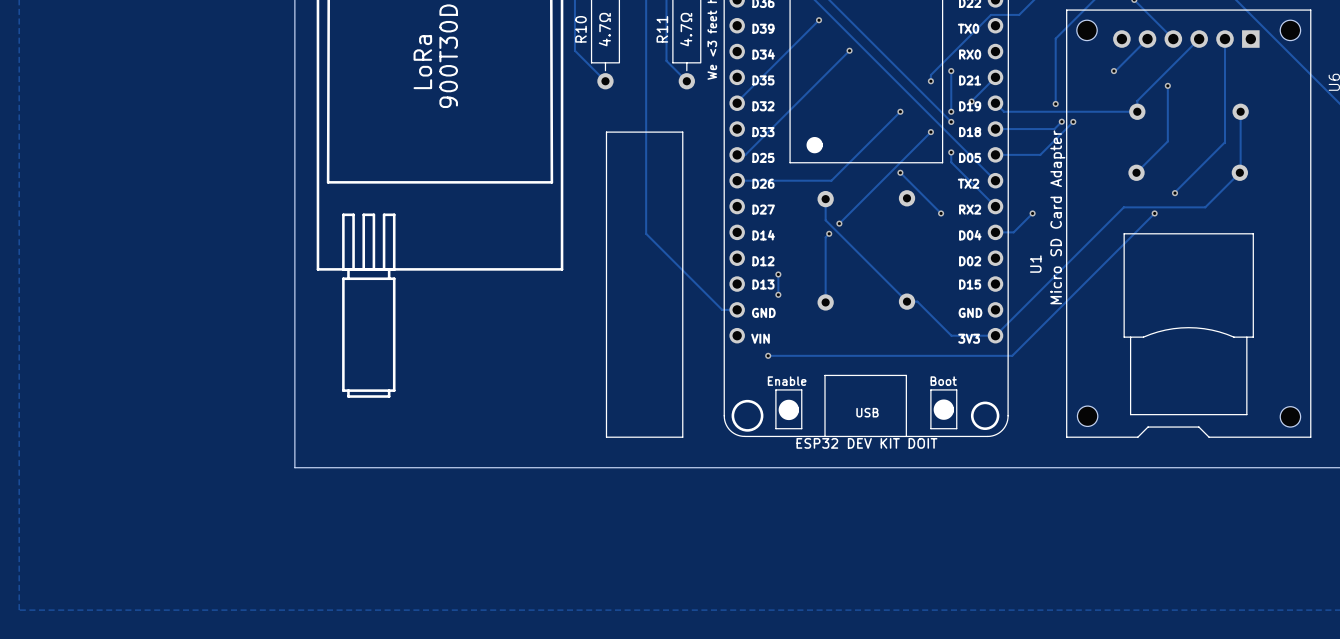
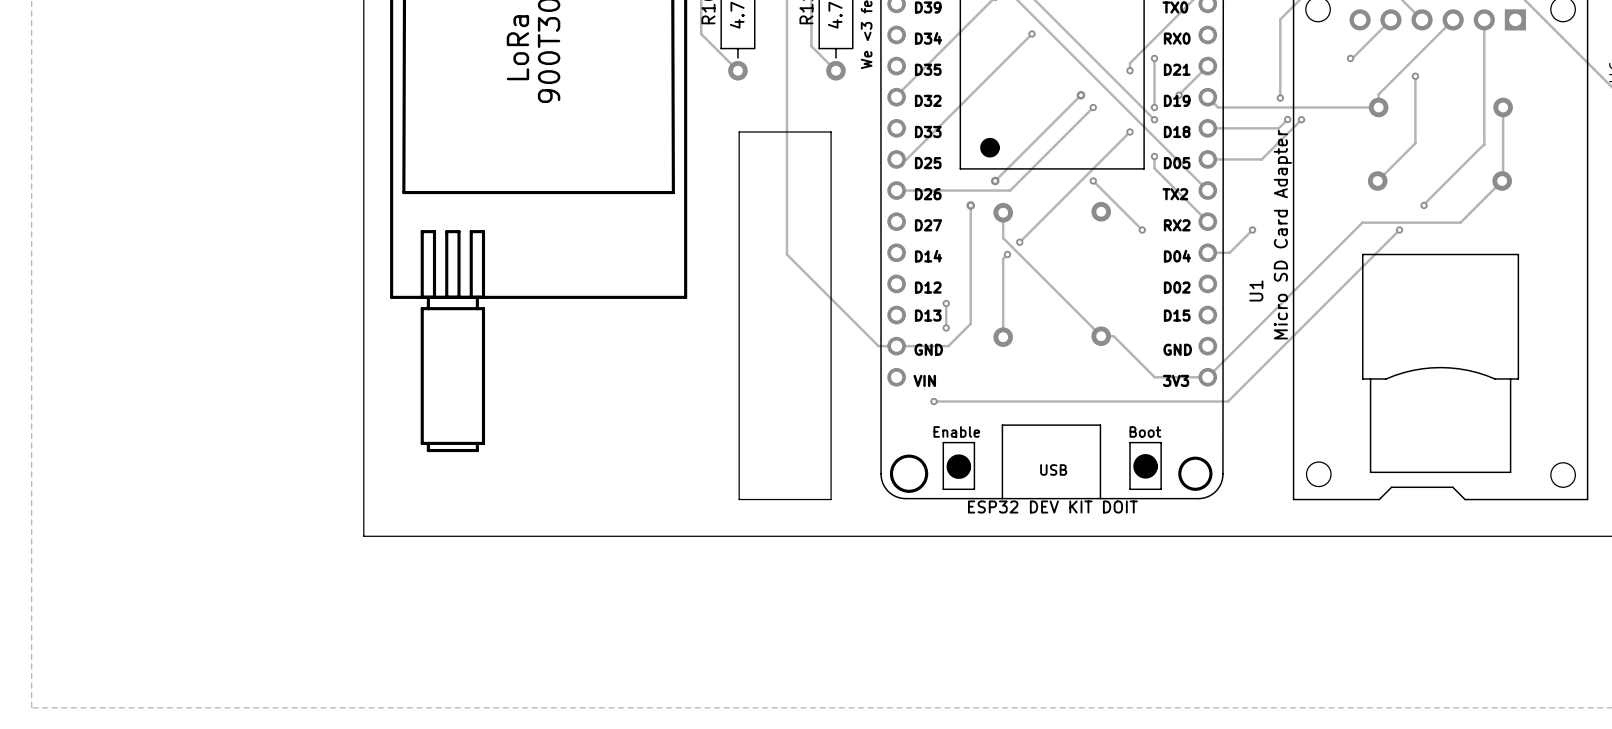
track: none -> (1081, 95) (995, 181)
via: none -> (1081, 95)
via: none -> (995, 181)
track: none -> (970, 205) (970, 323) (948, 346) (896, 346)
via: none -> (970, 205)

